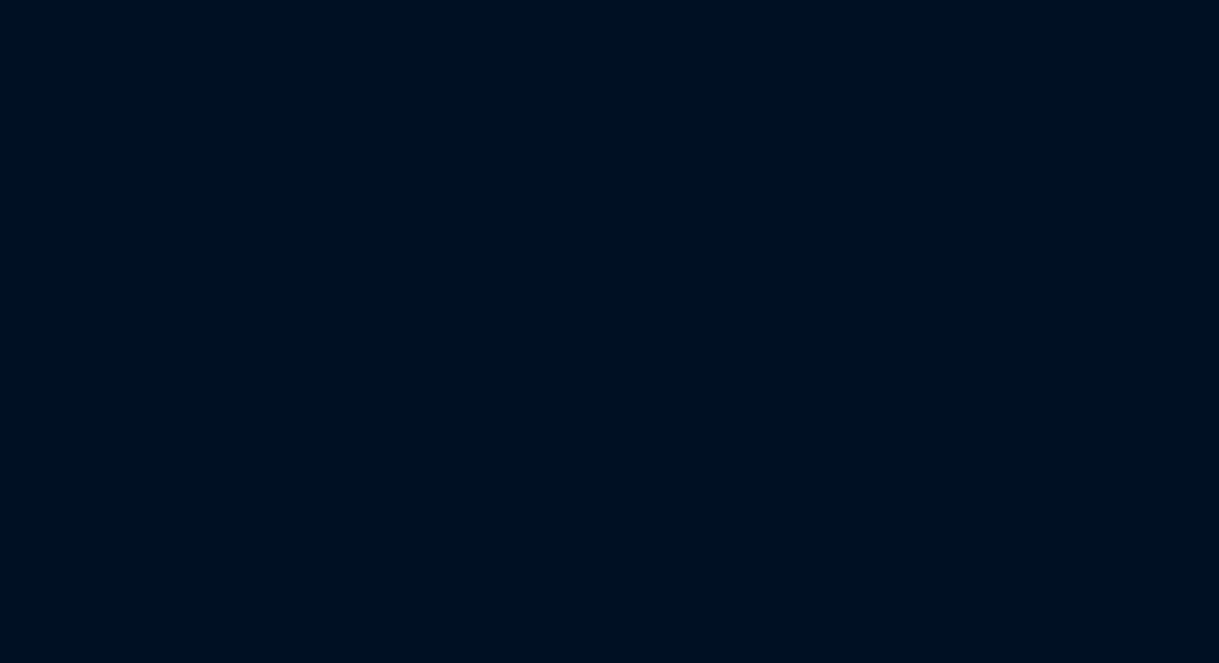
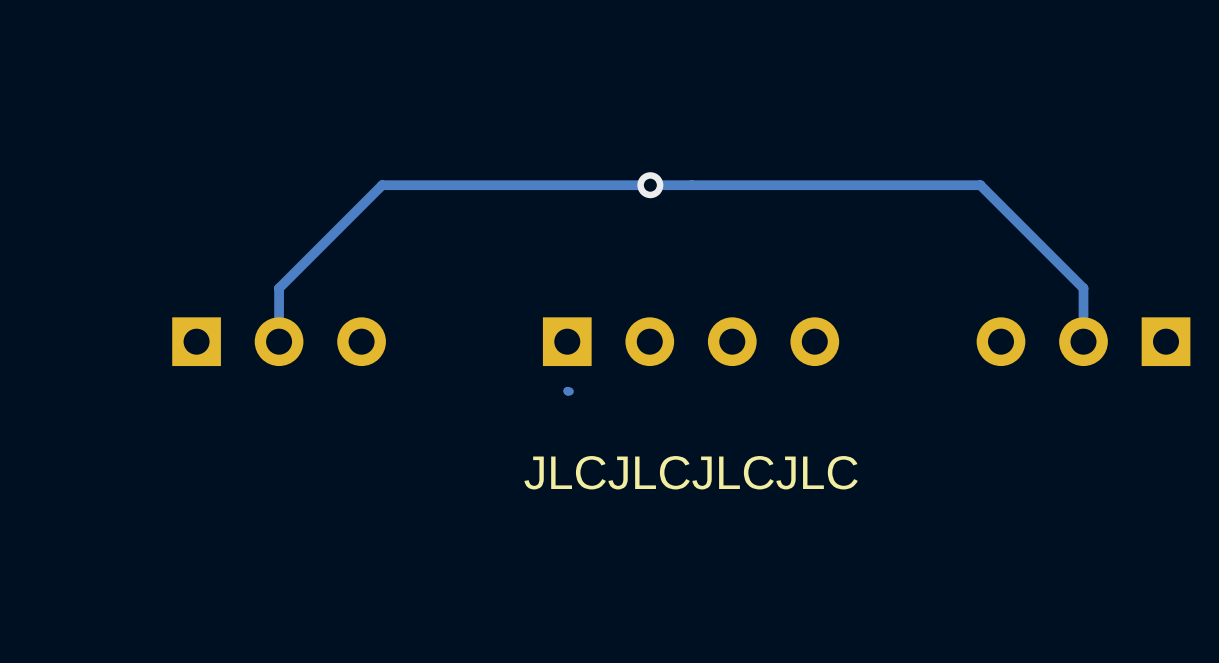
via: none -> (650, 185)
part: none -> (279, 341)
part: none -> (691, 341)
bottom track: none -> (1083, 341) (1083, 288) (980, 185) (382, 185) (279, 288) (279, 341)
part: none -> (1083, 341)
bottom track: none -> (567, 390) (569, 391)
text: none -> JLCJLCJLCJLC (691, 472)

